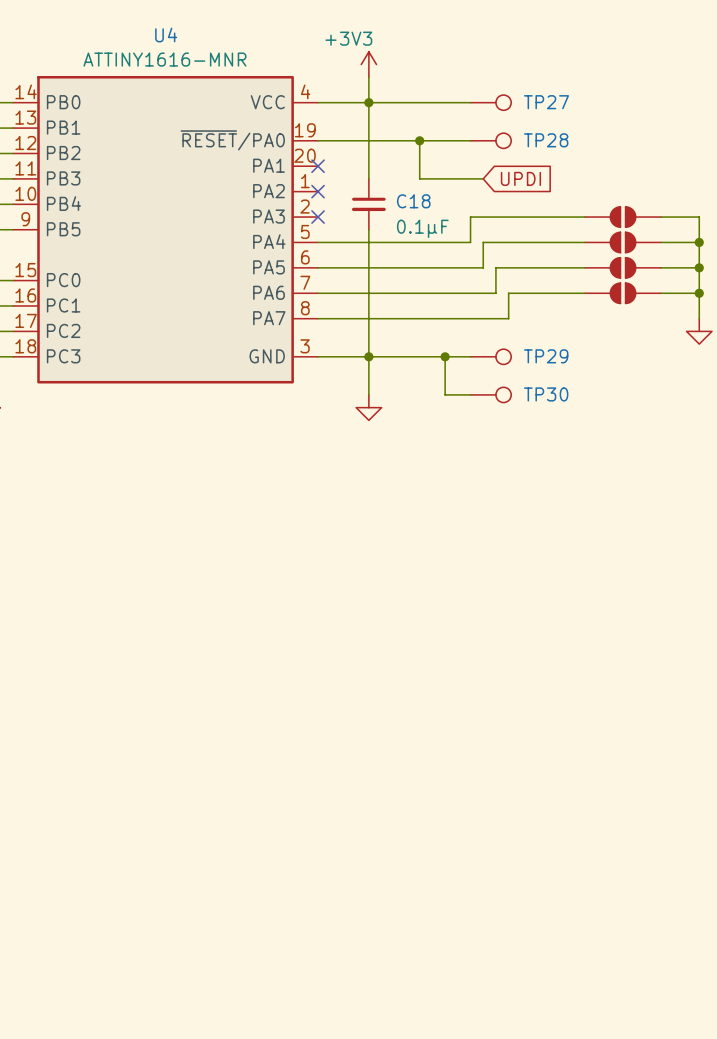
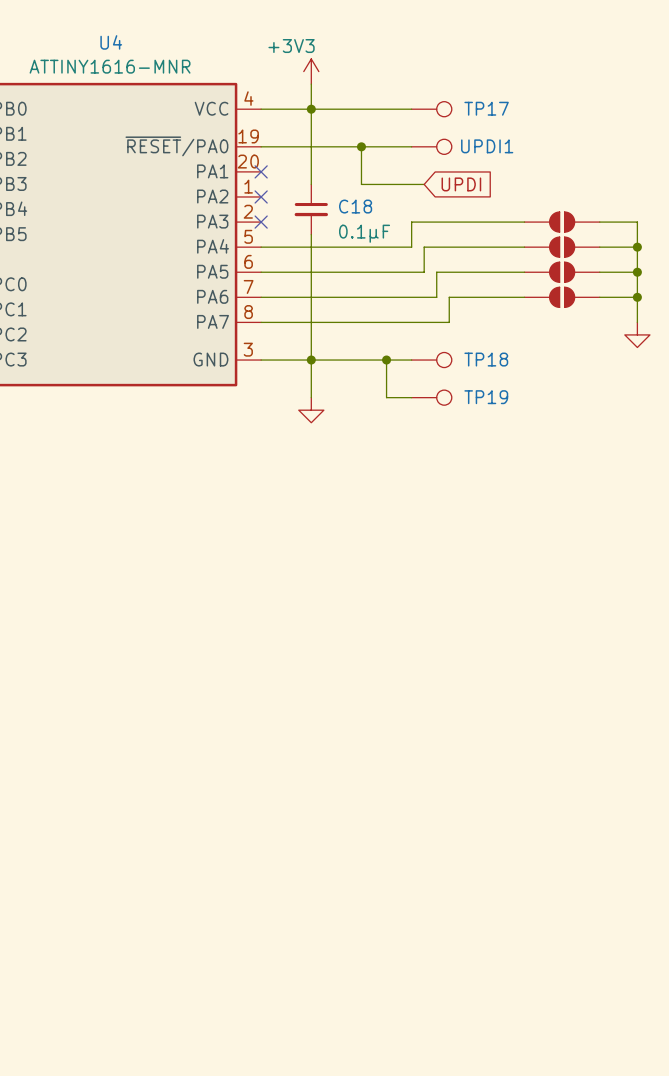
TP27 name: TP27 (546, 102) -> TP17 (486, 108)
TP28 name: TP28 (546, 140) -> UPDI1 (487, 146)
TP29 name: TP29 (546, 356) -> TP18 (486, 359)
TP30 name: TP30 (546, 394) -> TP19 (486, 397)

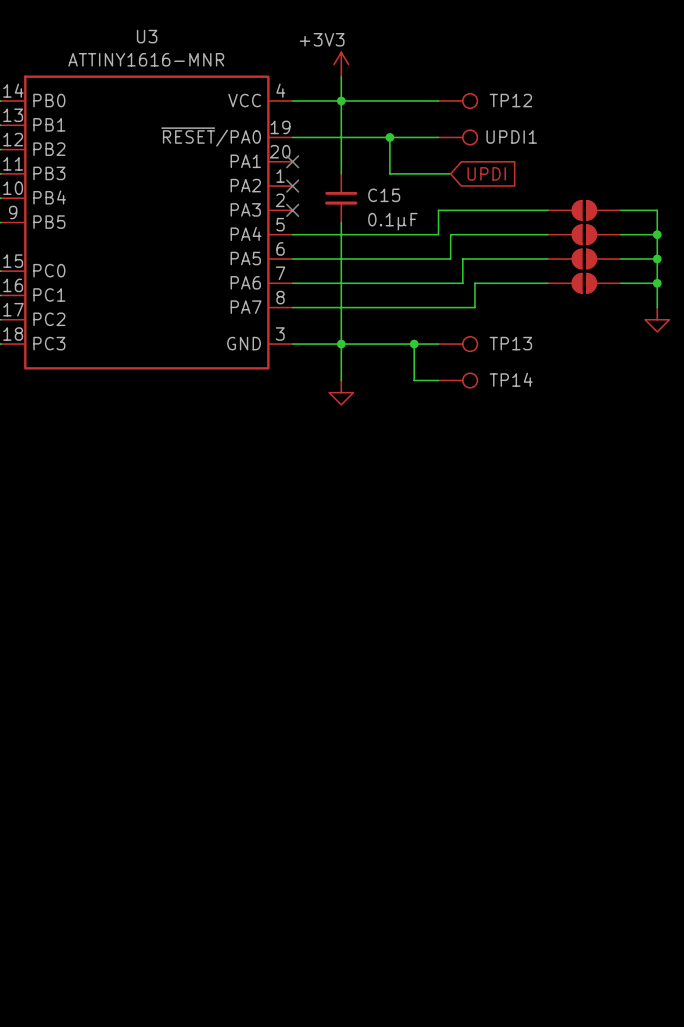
U4 name: U4 (111, 42) -> U3 (147, 36)
TP17 name: TP17 (486, 108) -> TP12 (510, 100)
C18 name: C18 (355, 206) -> C15 (384, 195)
TP18 name: TP18 (486, 359) -> TP13 (510, 343)
TP19 name: TP19 (486, 397) -> TP14 (511, 379)

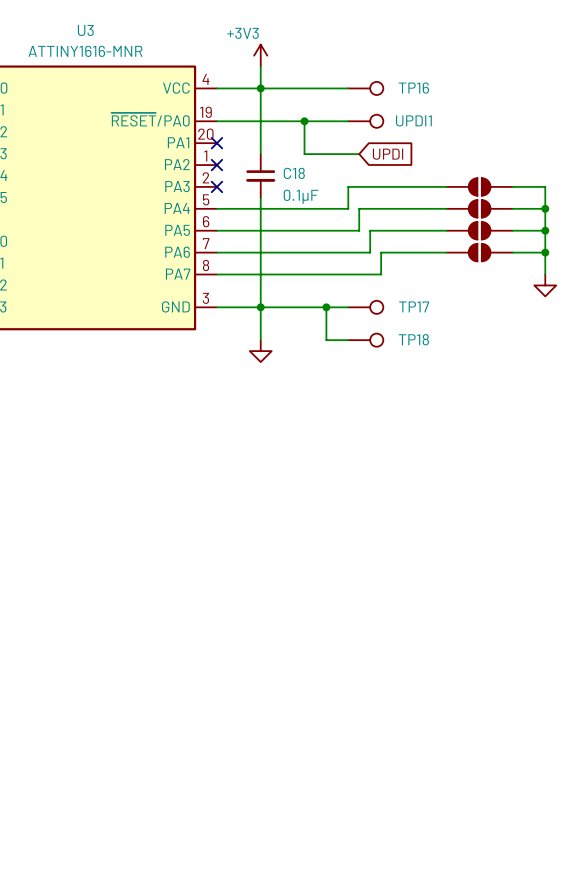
TP12 name: TP12 (510, 100) -> TP16 (413, 88)
C15 name: C15 (384, 195) -> C18 (294, 173)
TP13 name: TP13 (510, 343) -> TP17 (414, 306)
TP14 name: TP14 (511, 379) -> TP18 (413, 339)

